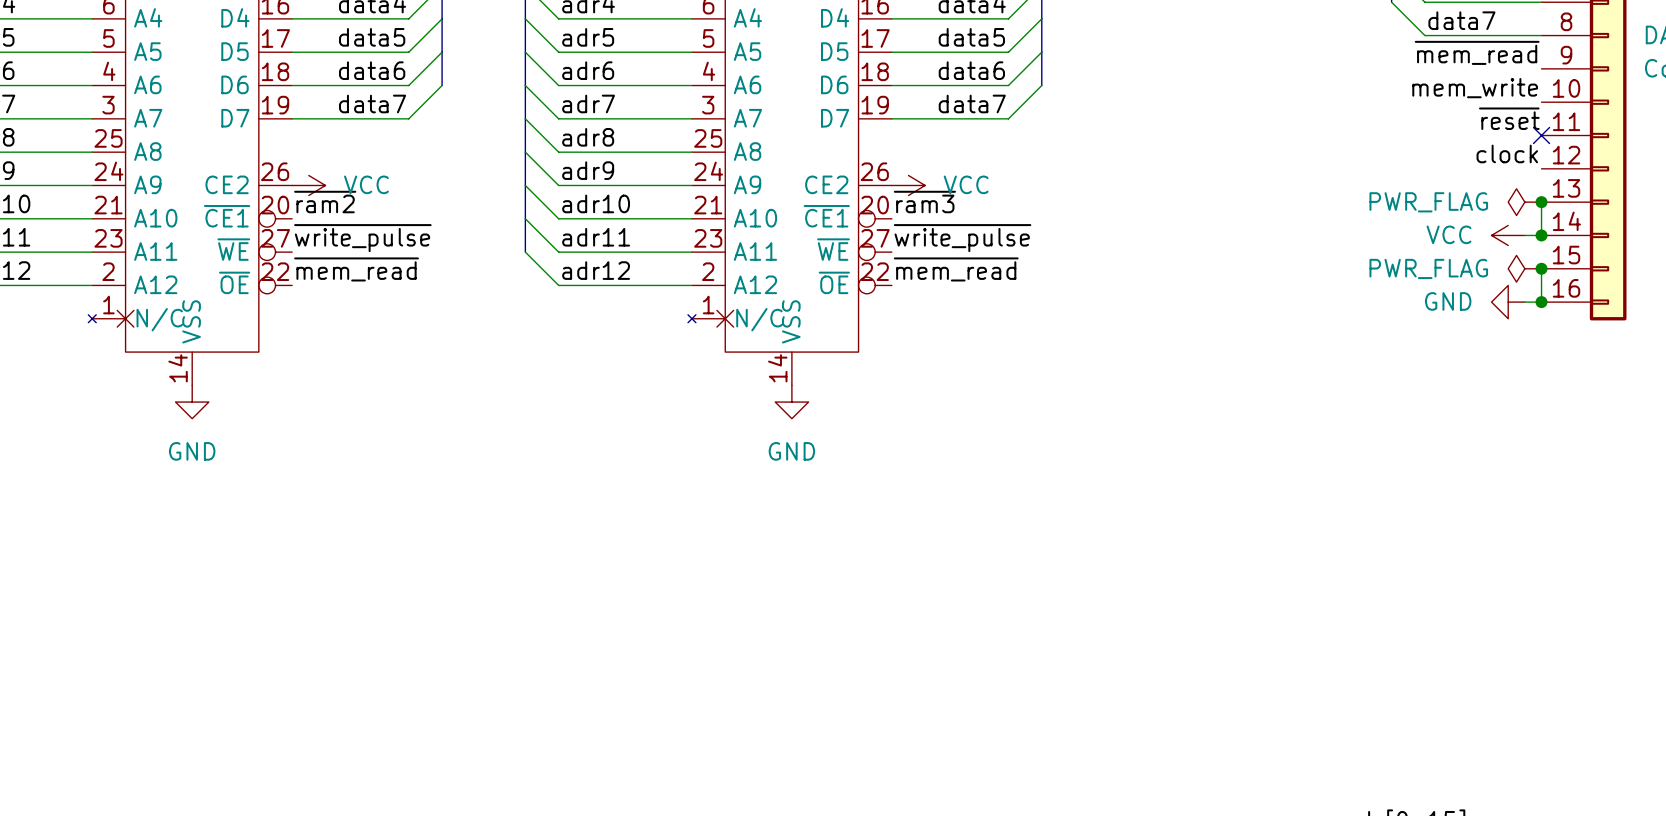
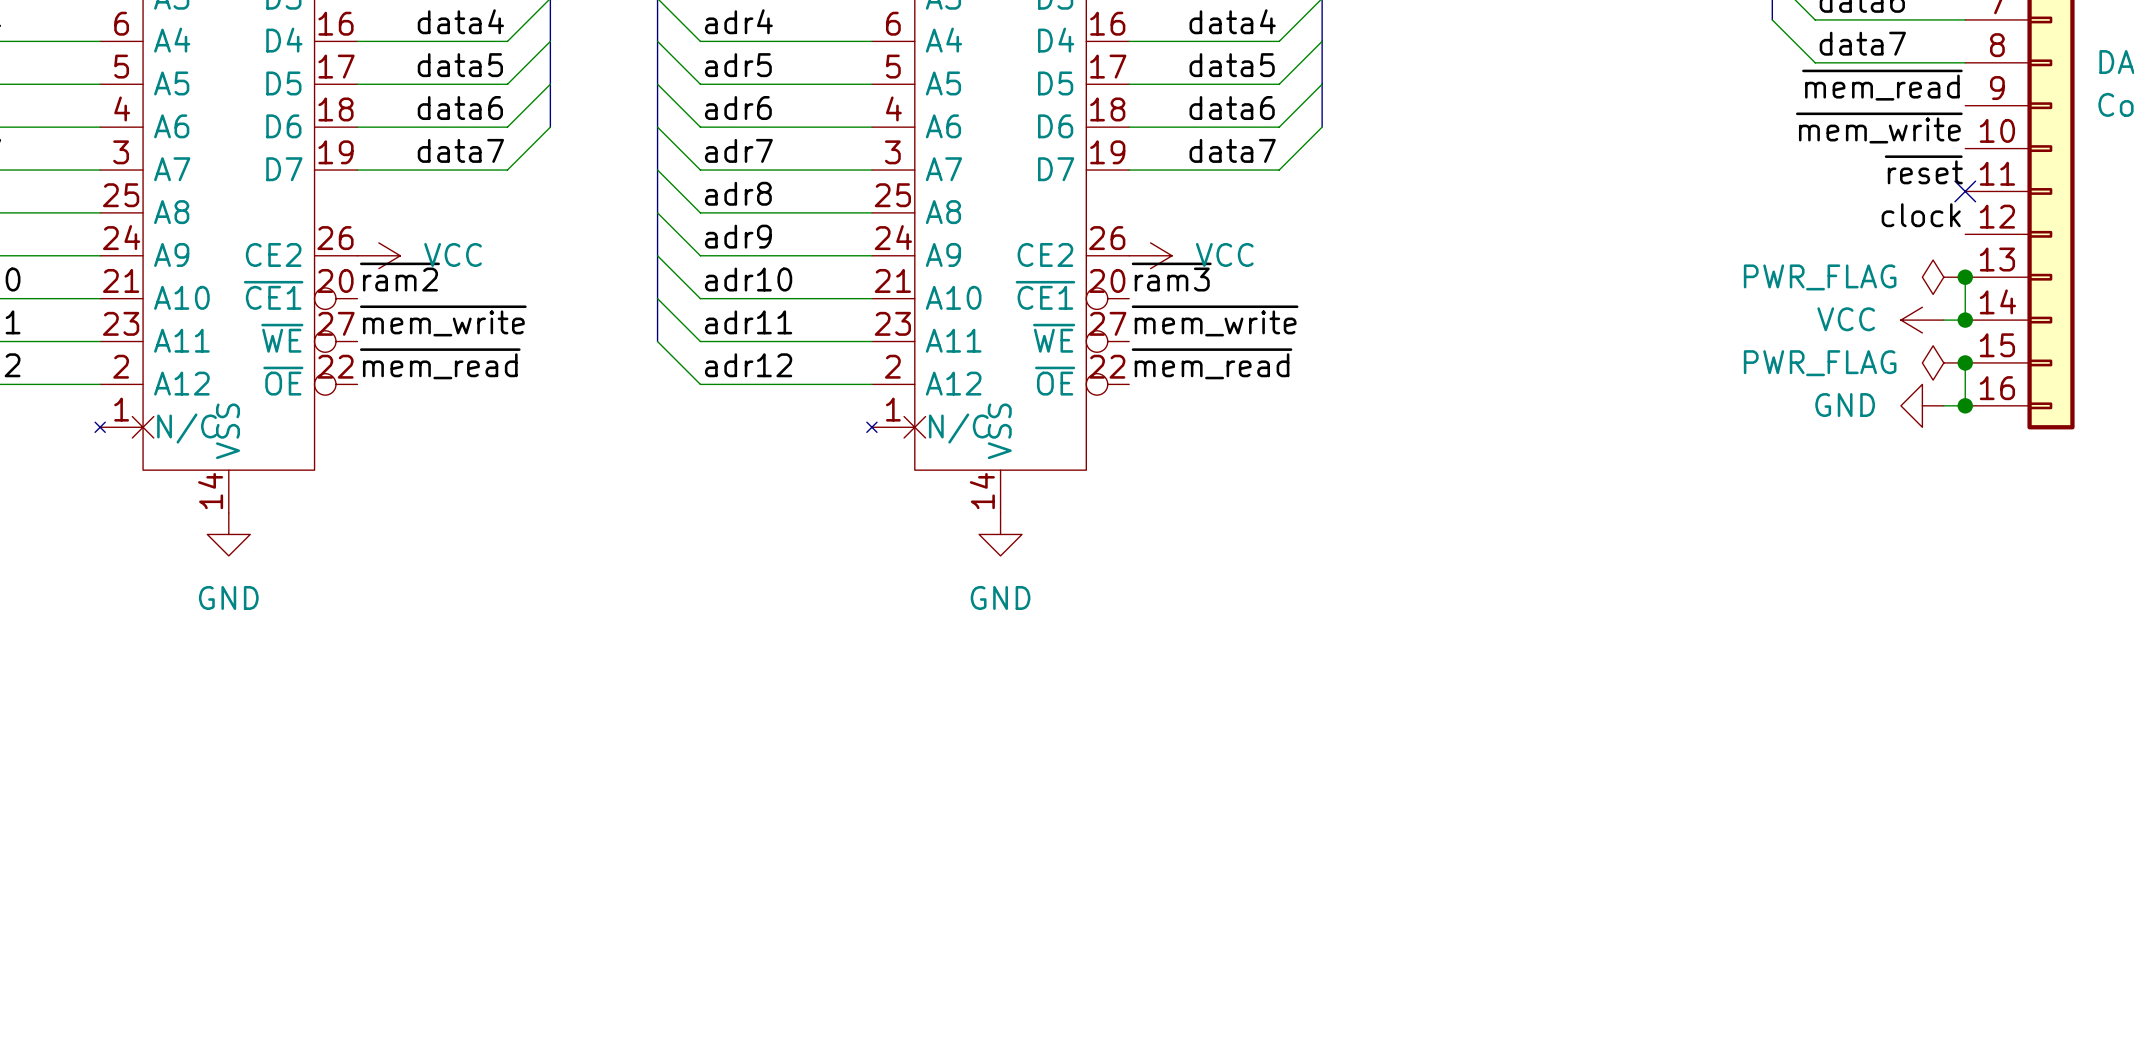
label: mem_write (1475, 88) -> ~{mem_write} (1879, 128)
label: ~{write_pulse} (362, 238) -> ~{mem_write} (443, 320)
label: ~{write_pulse} (962, 238) -> ~{mem_write} (1215, 320)

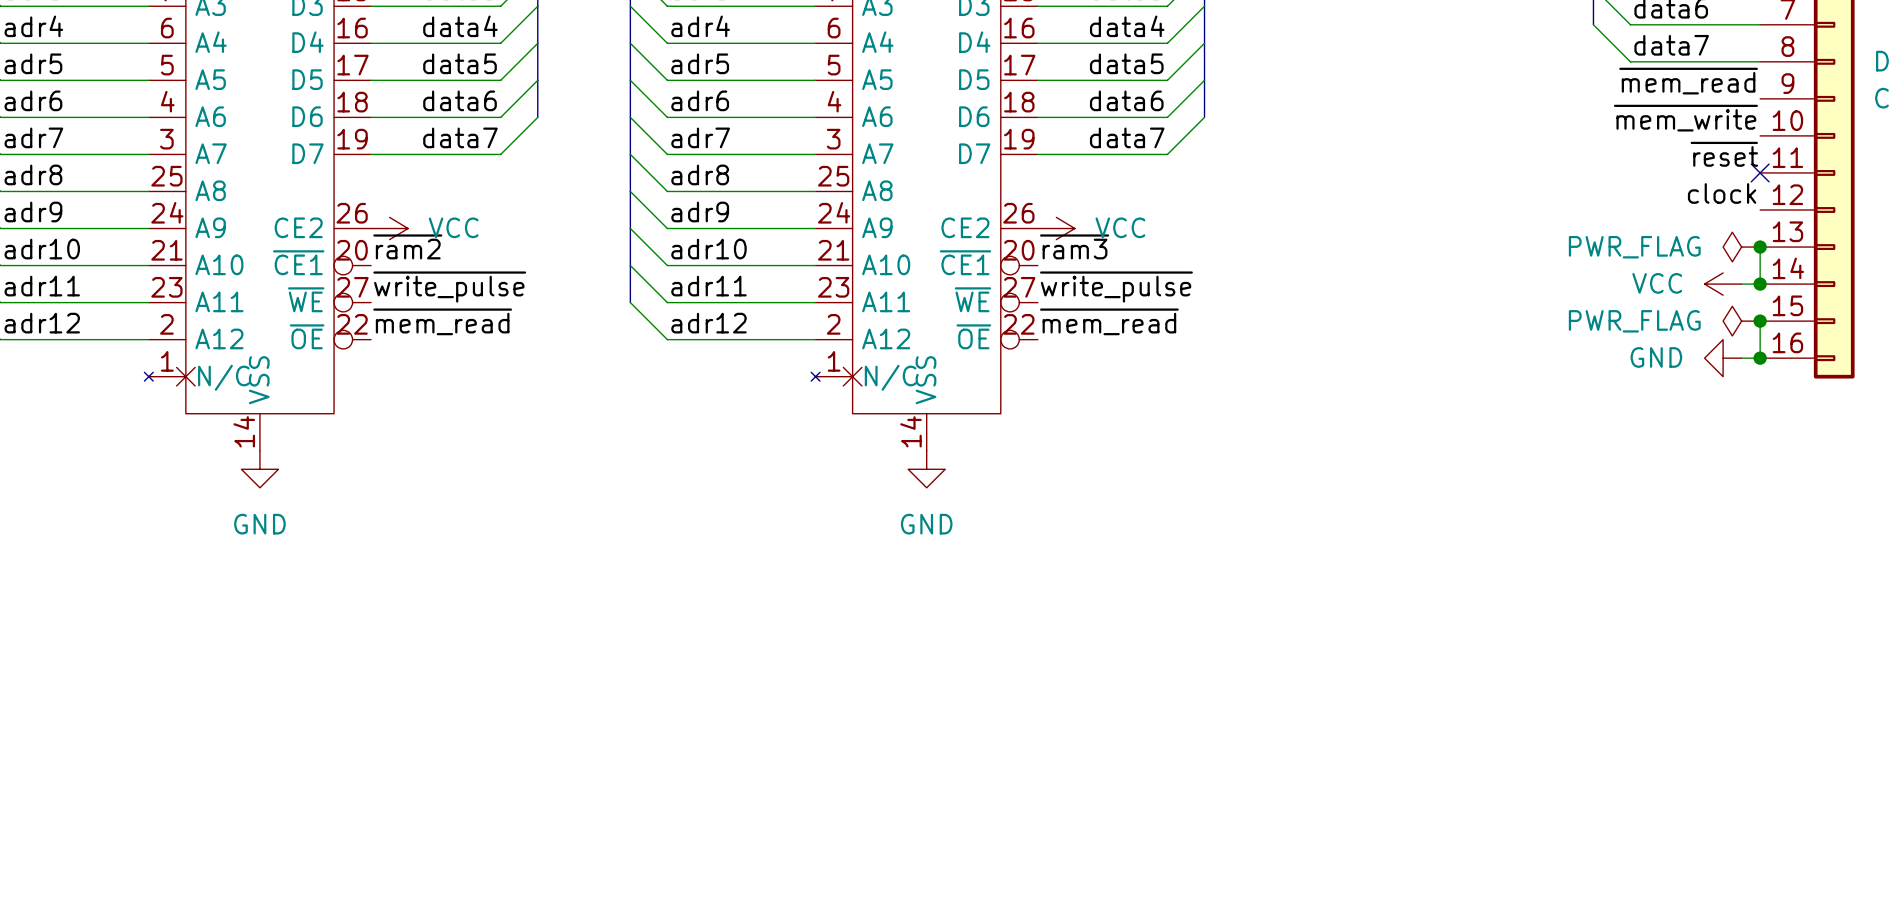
label: ~{mem_write} (443, 320) -> ~{write_pulse} (449, 287)
label: ~{mem_write} (1215, 320) -> ~{write_pulse} (1116, 287)

